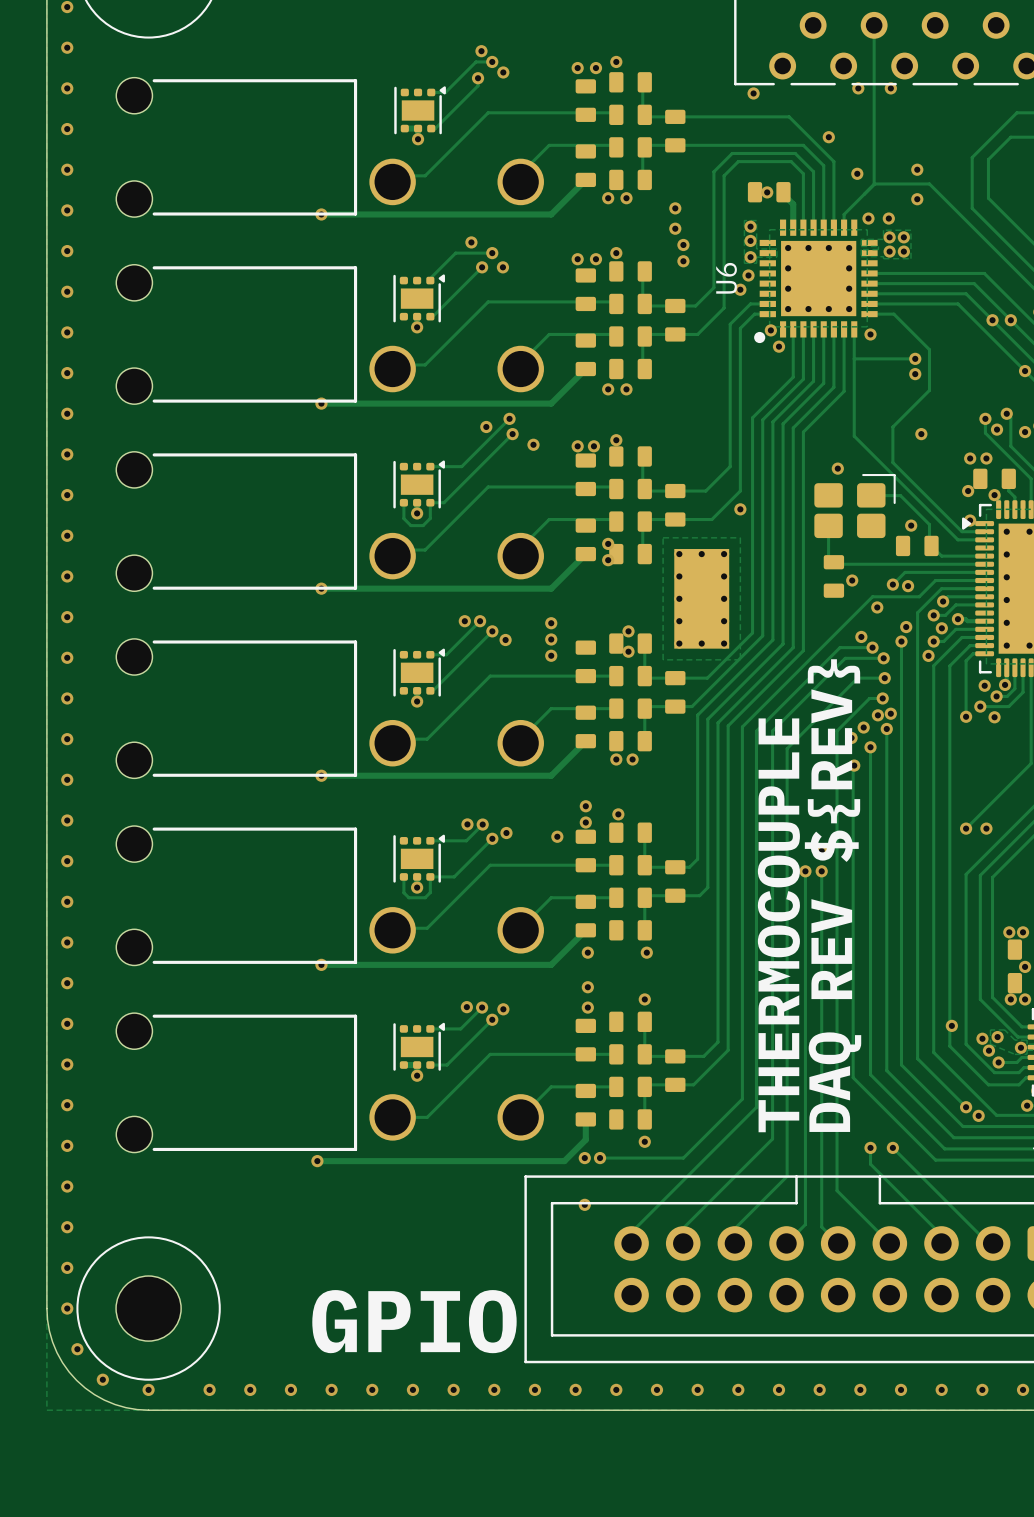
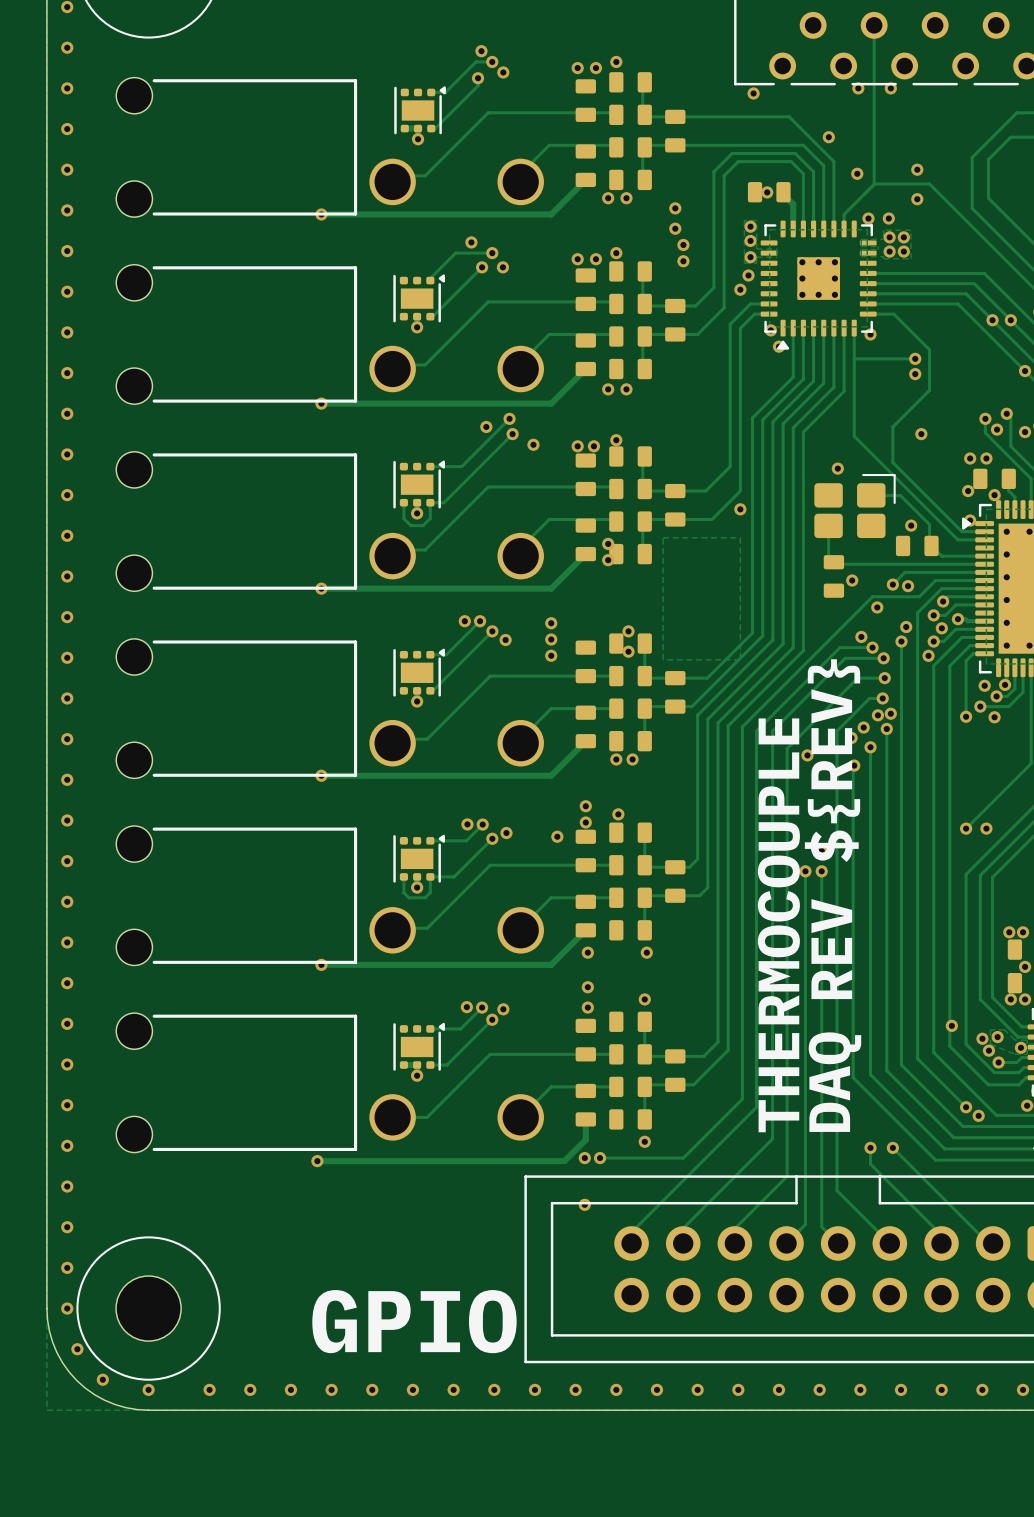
U6: (815, 281) -> none
part: none -> (818, 285)
part: (701, 598) -> none
via: none -> (807, 755)

